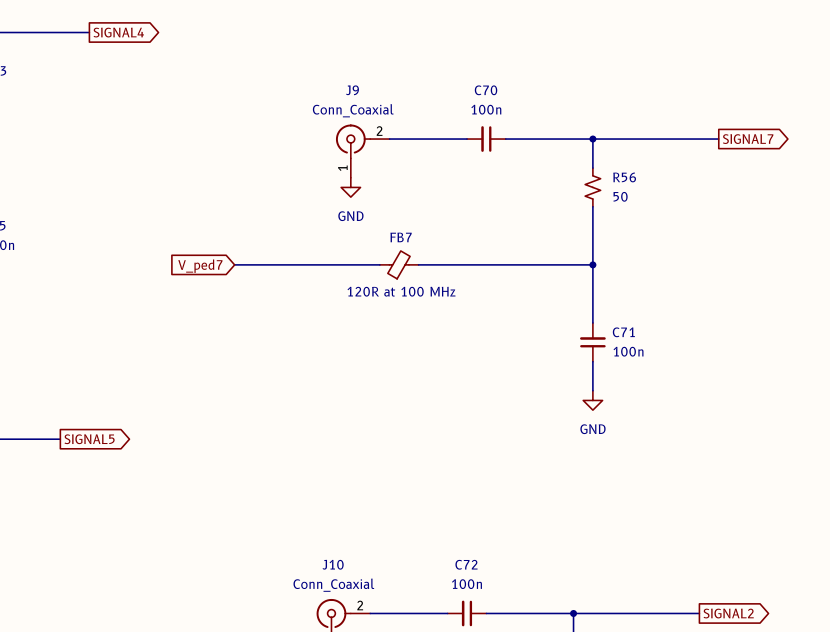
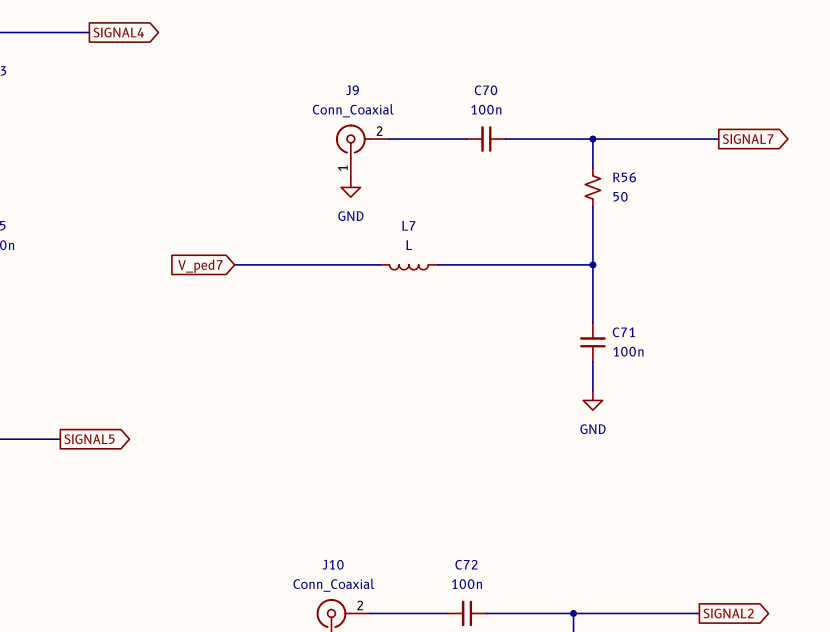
FB7: 120R at 100 MHz (399, 264) -> none
L7: none -> L (408, 267)

